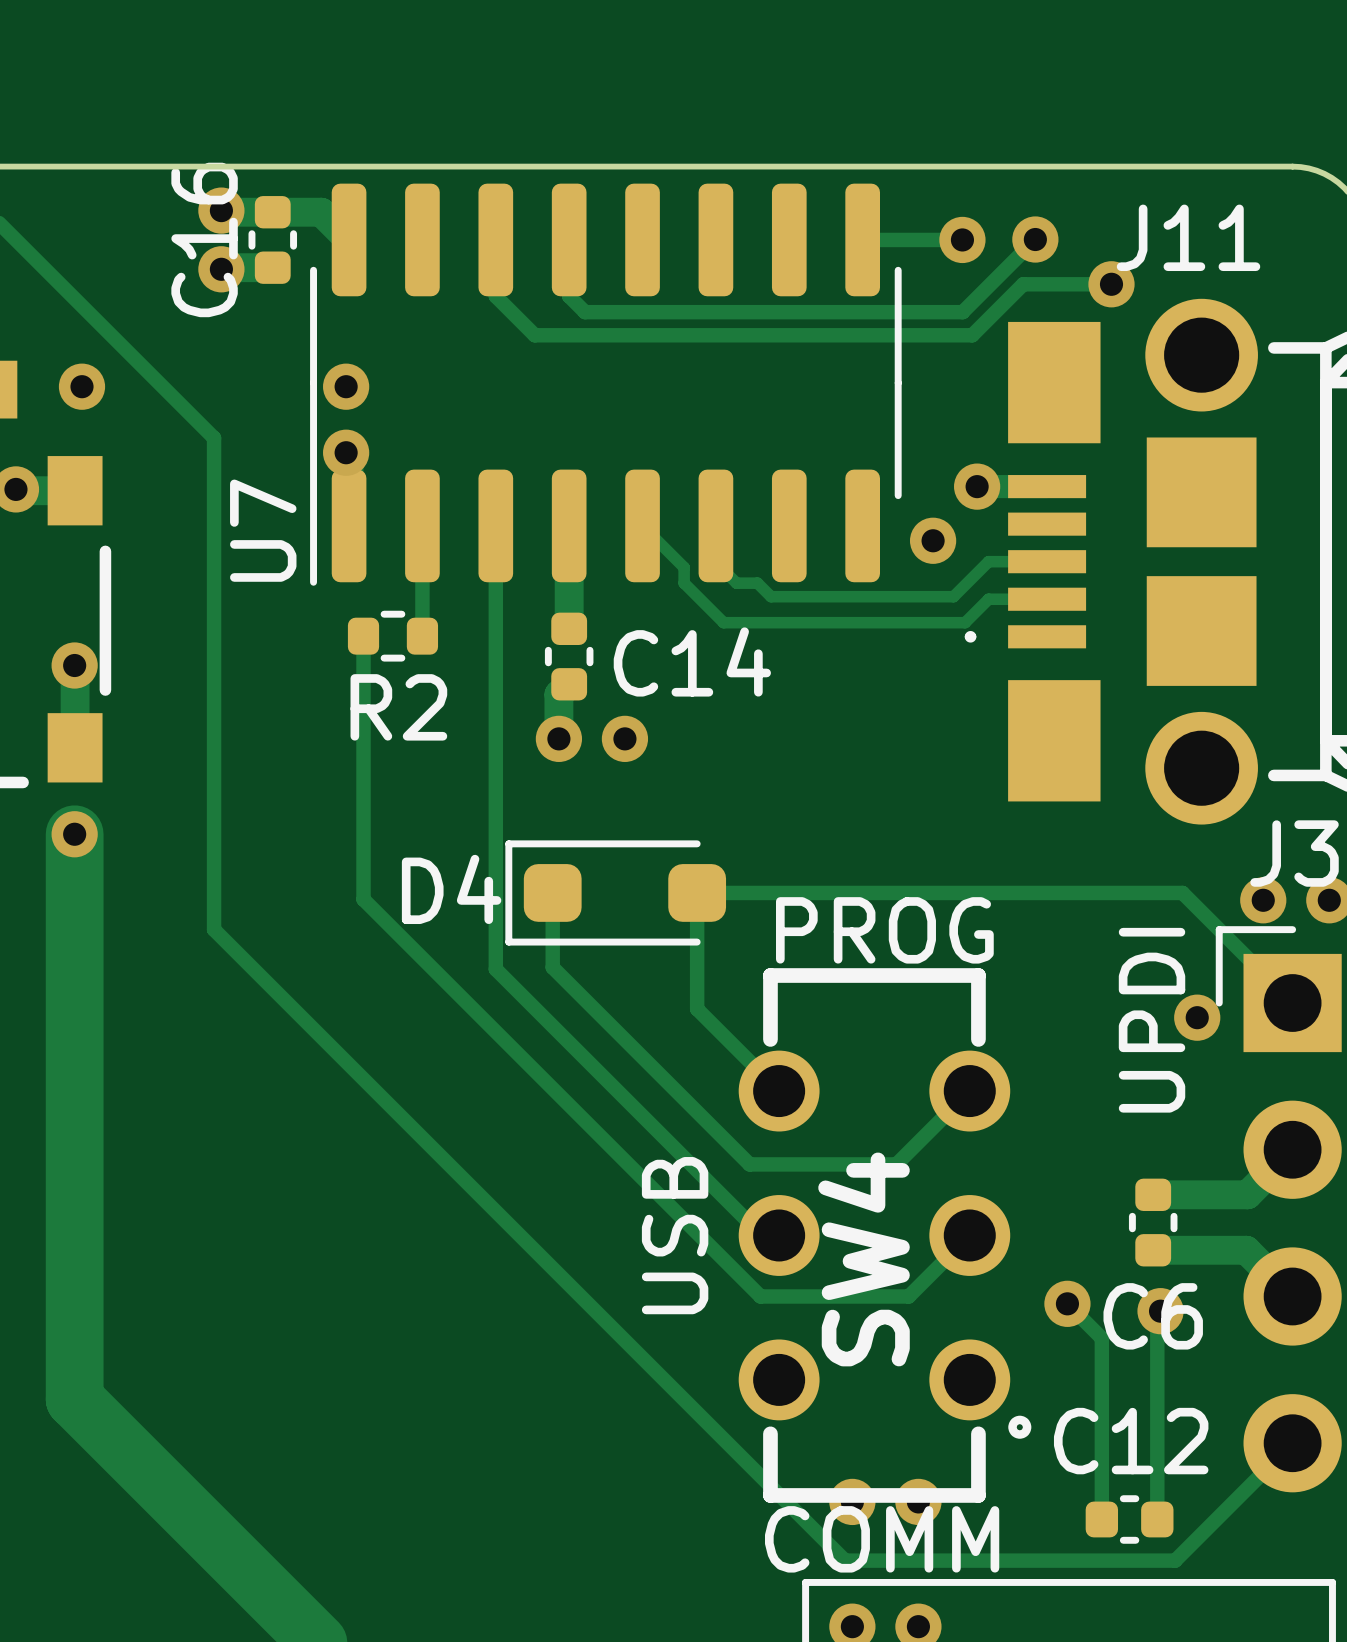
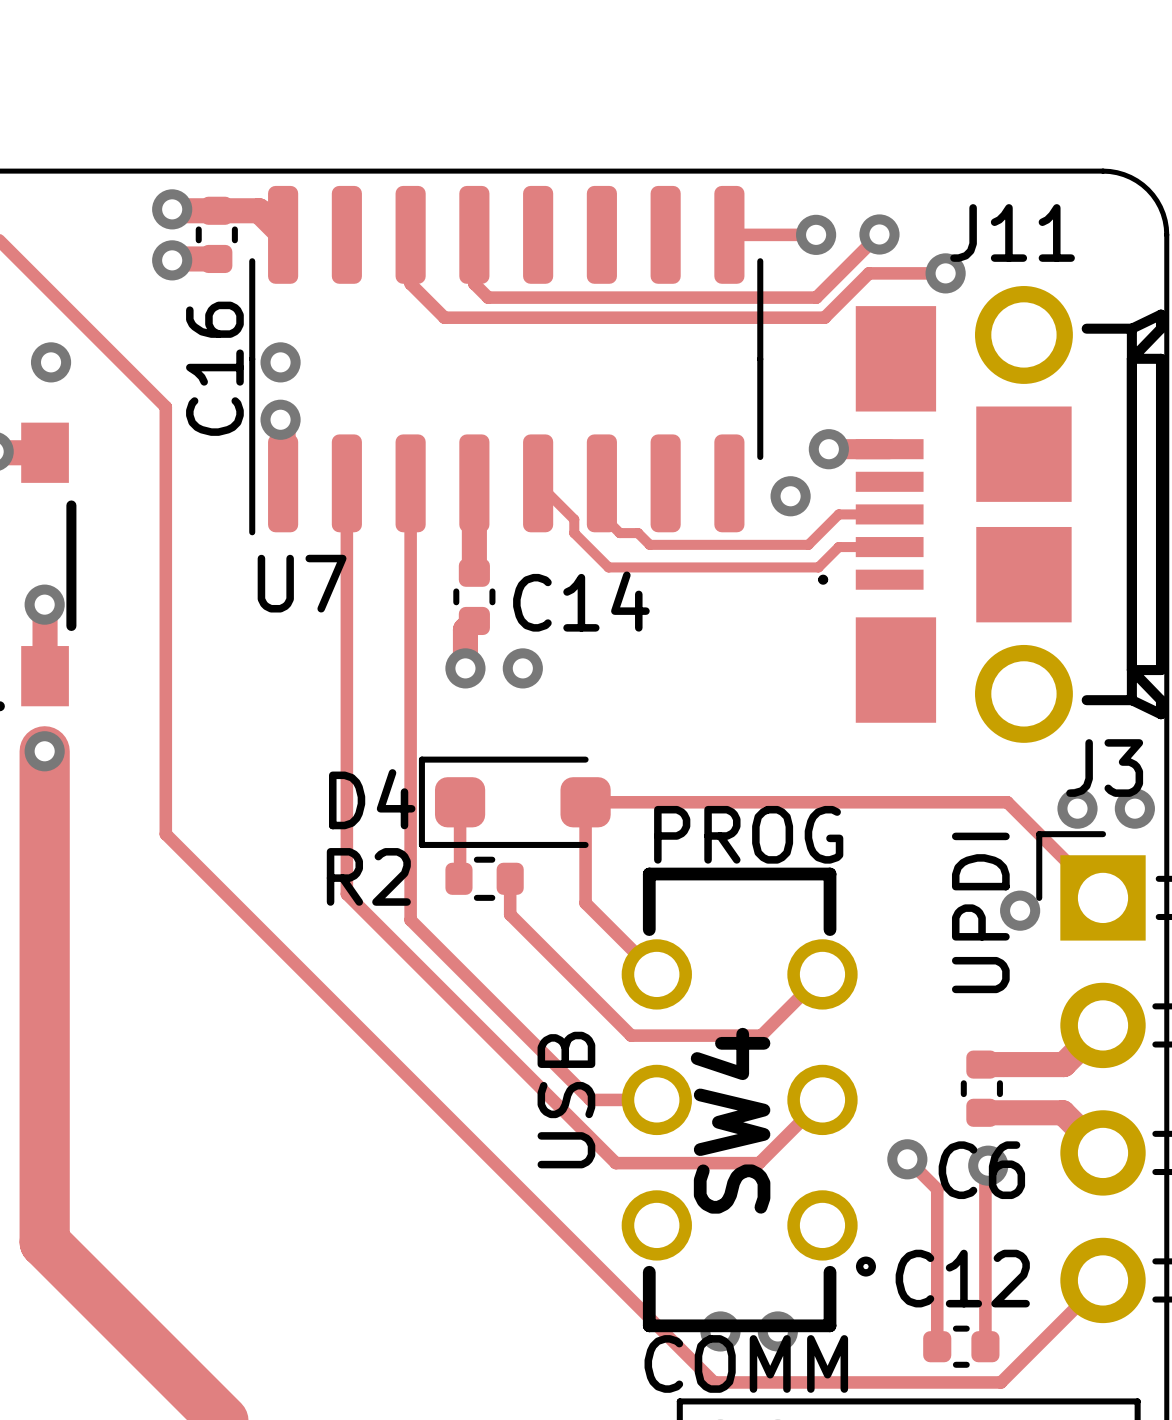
C16 name position: C16 (204, 239) -> C16 (214, 368)
U7 name rotation: 0° (263, 530) -> 90° clockwise (302, 583)
U7 name position: U7 (263, 530) -> U7 (302, 583)
track: (363, 636) (363, 899) (760, 1296) (908, 1296) -> (346, 579) (346, 894) (615, 1163) (759, 1163) (769, 1152)
R2 position: (392, 636) -> (484, 878)
R2 name position: R2 (398, 707) -> R2 (368, 876)
track: (552, 967) (749, 1164) (896, 1164) (899, 1161) -> (510, 878) (510, 914) (631, 1035) (761, 1035)
track: (495, 969) (762, 1235) -> (410, 868) (410, 920) (590, 1099) (641, 1099)

